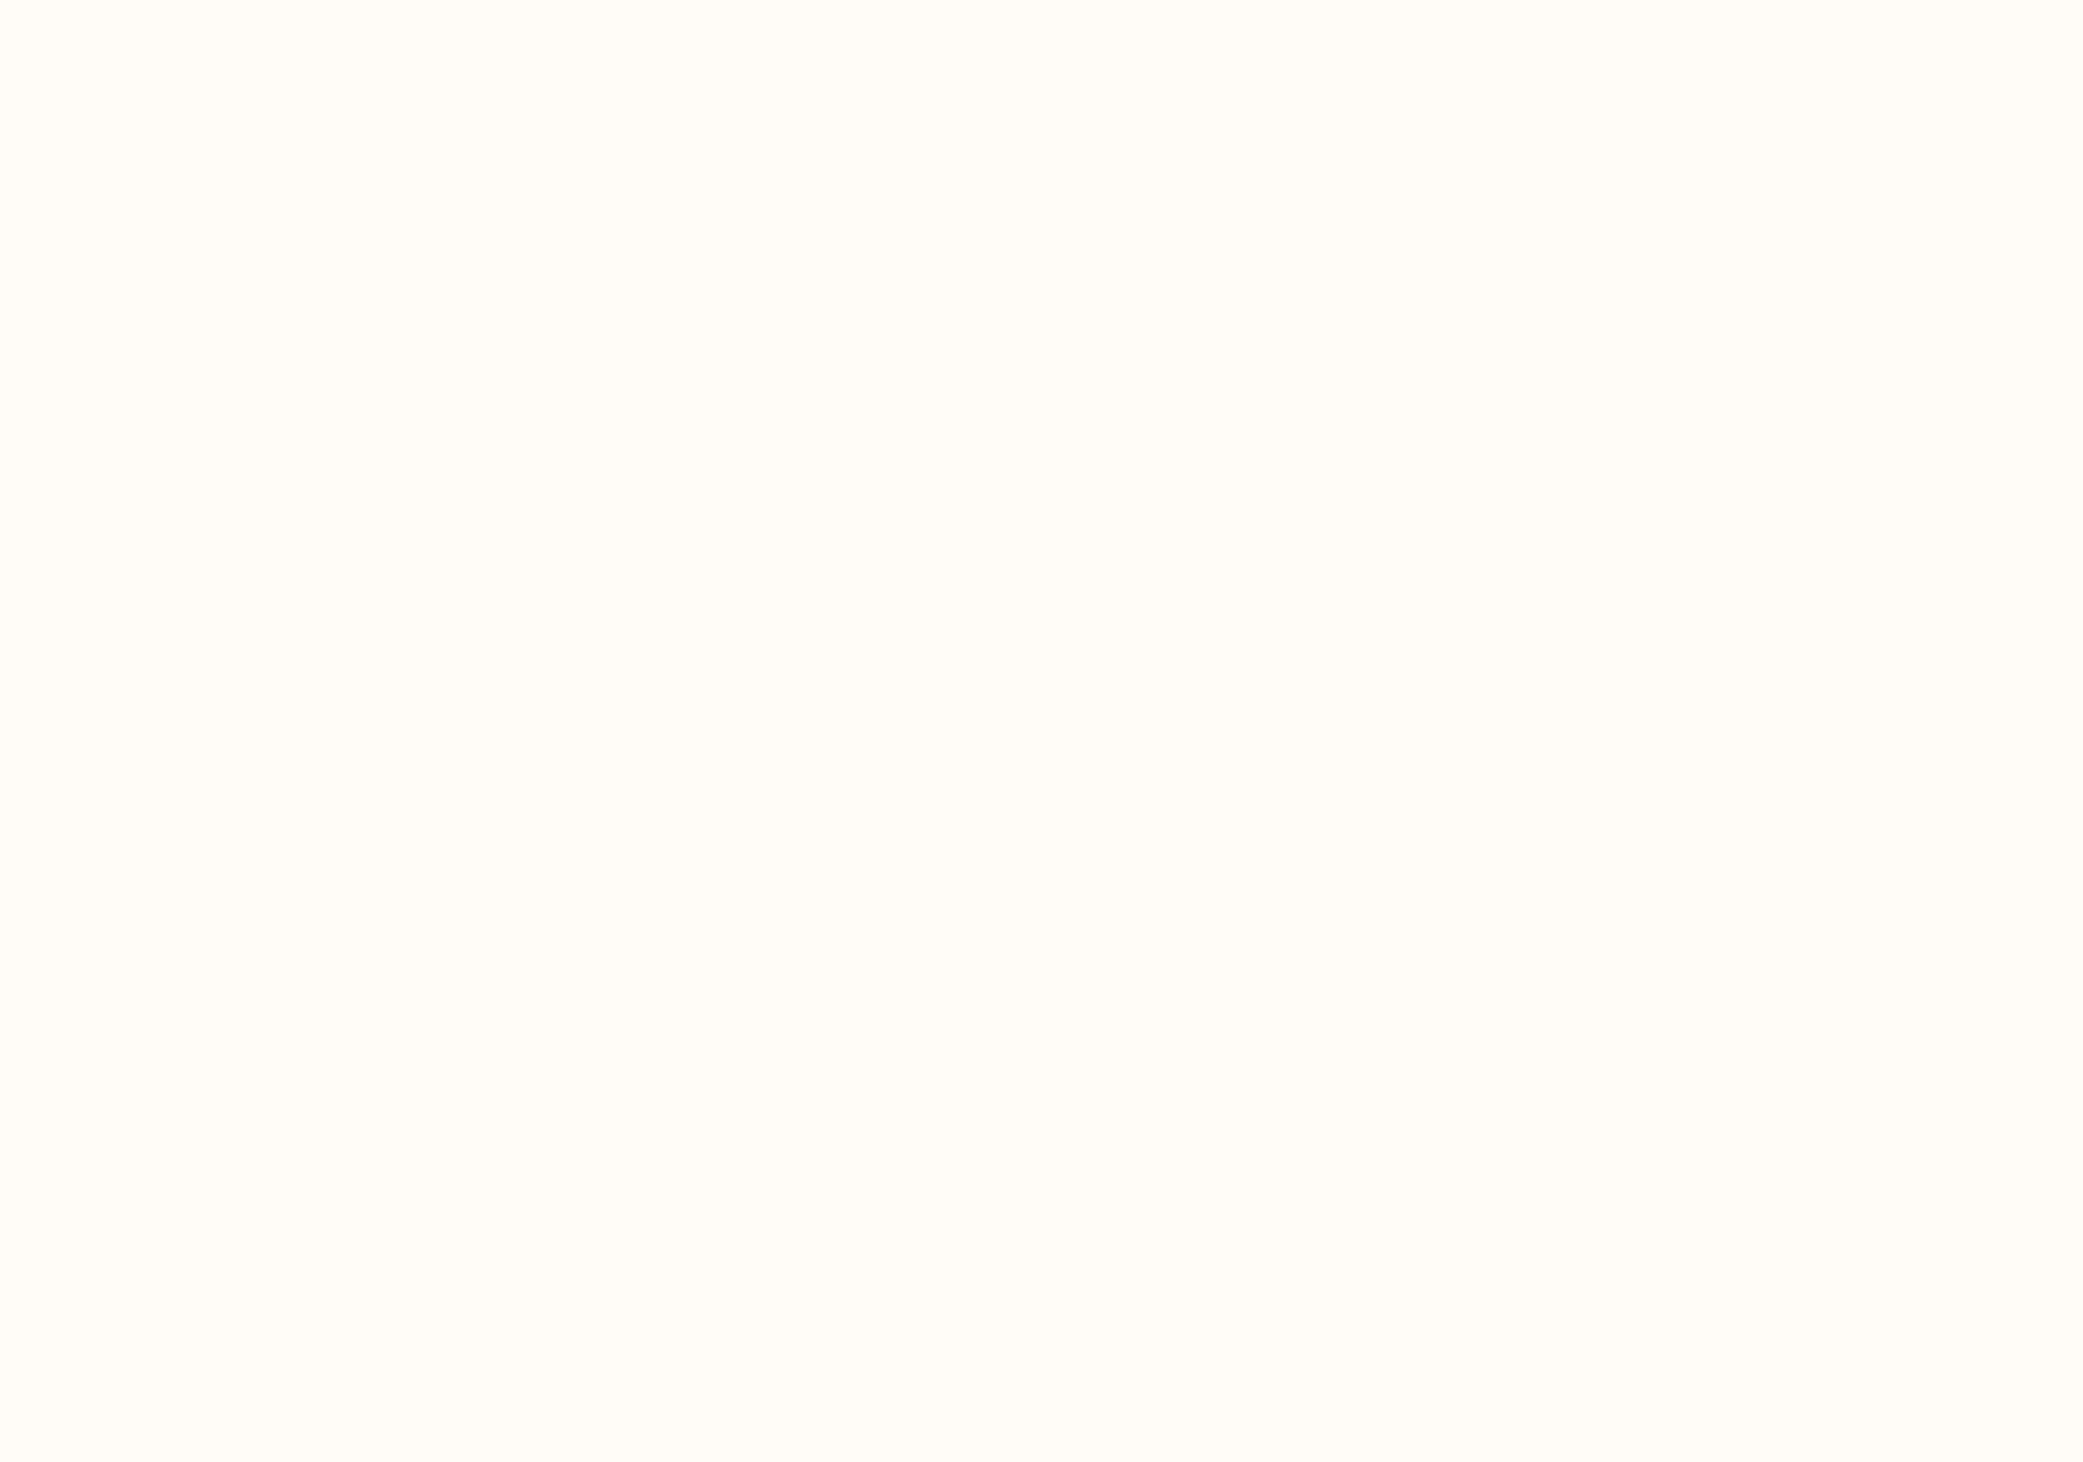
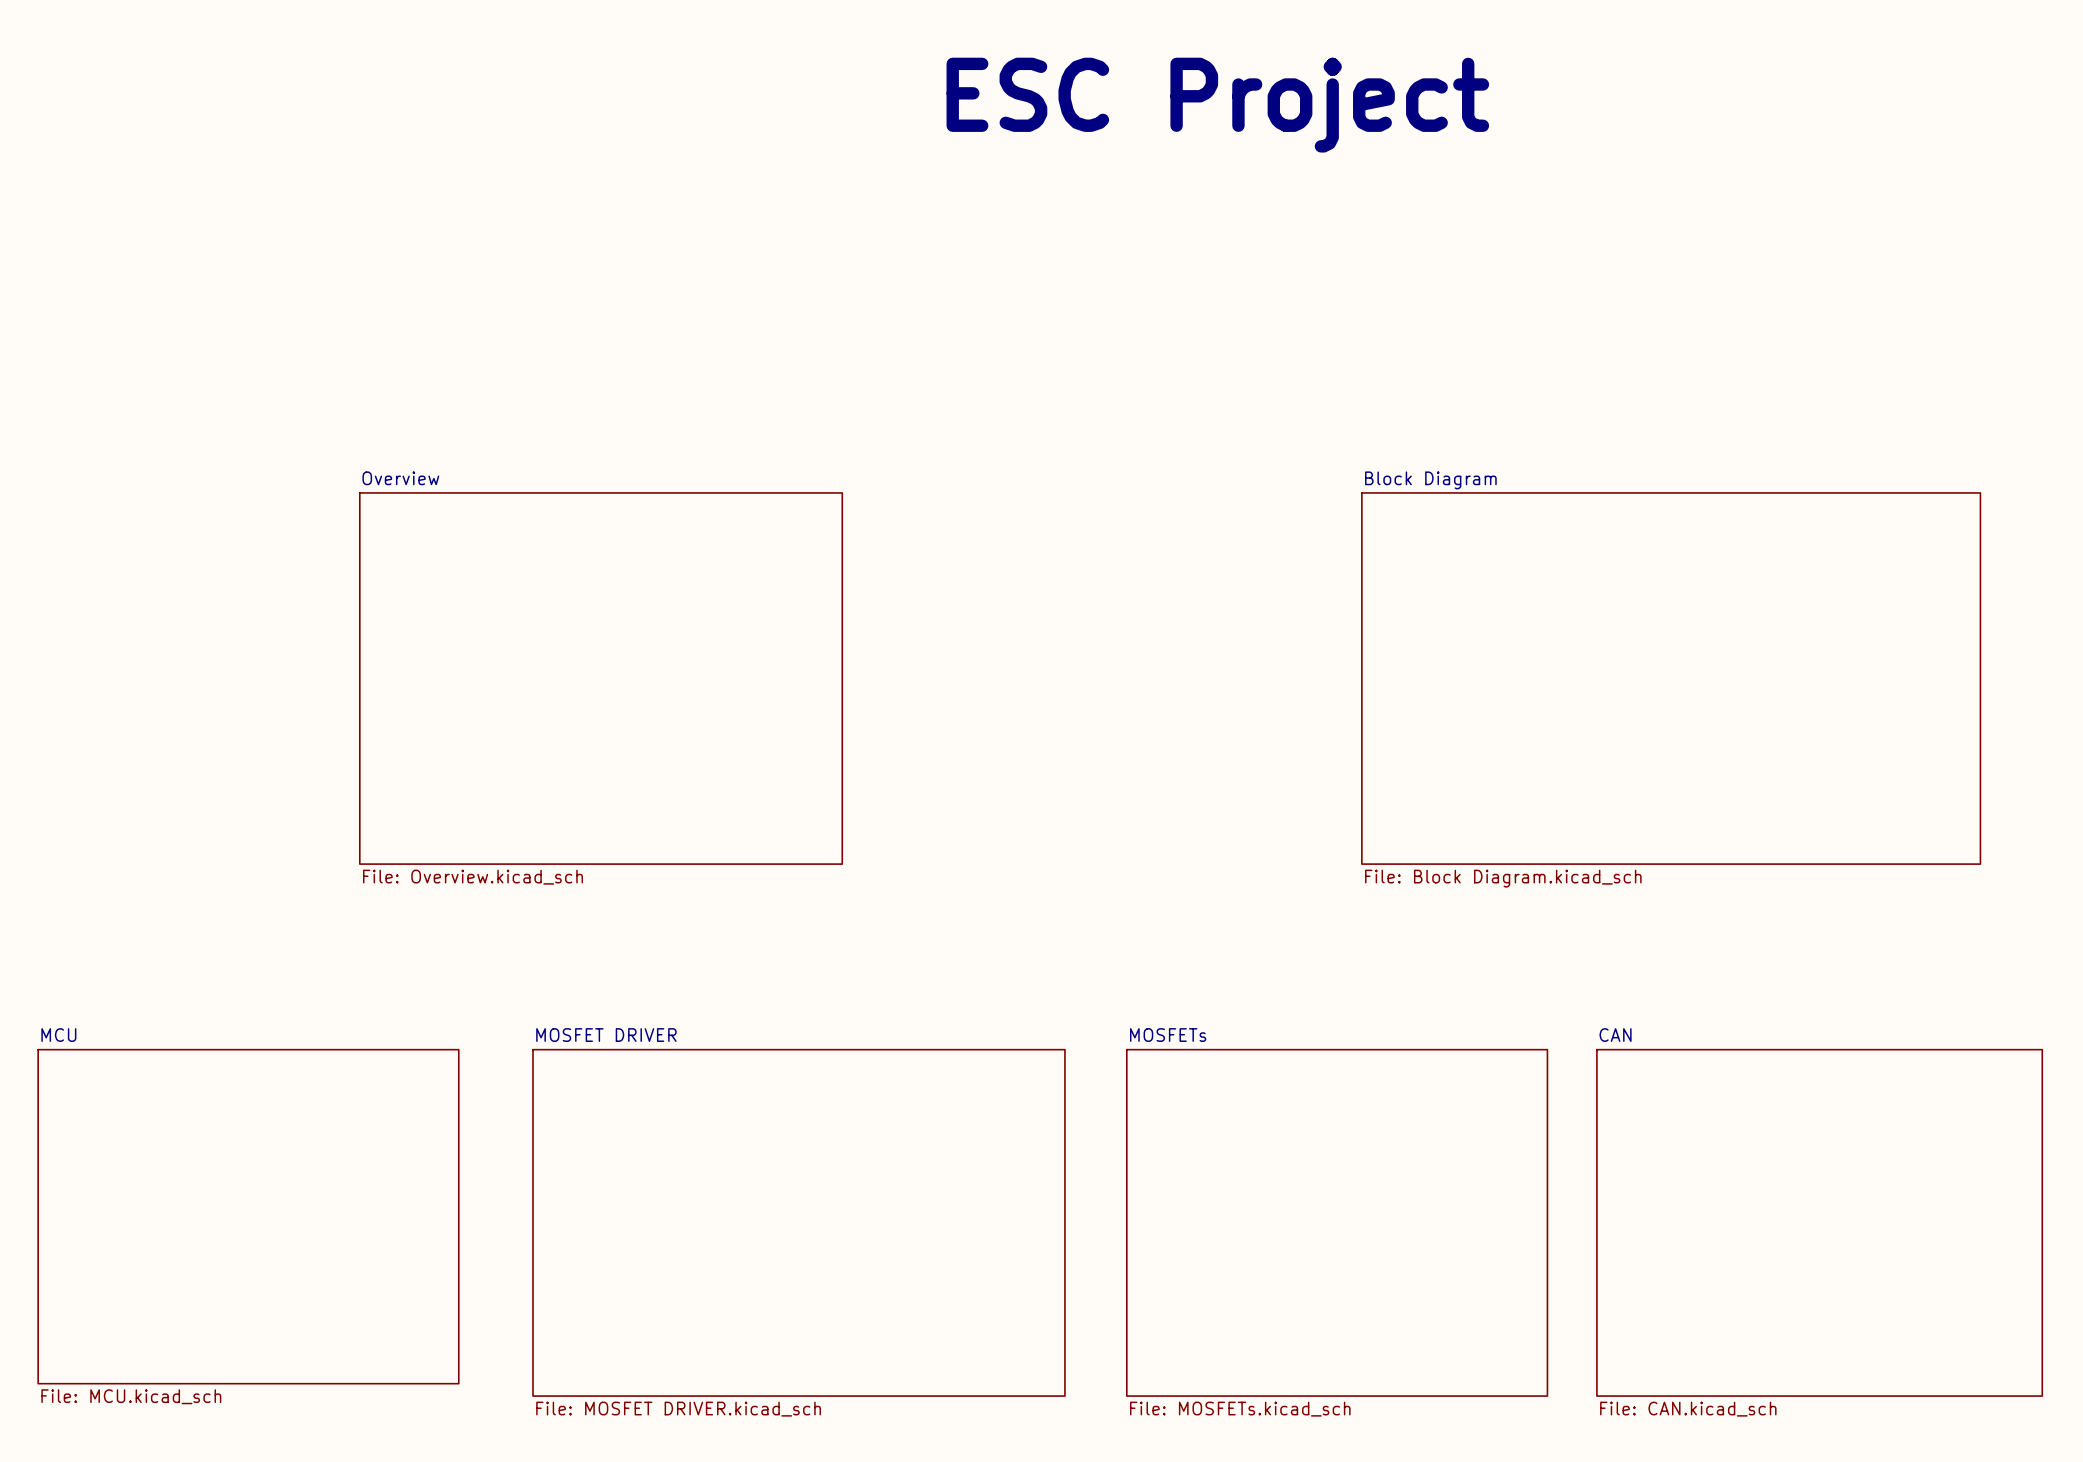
text: none -> ESC Project (1217, 105)
sheet Overview: none -> File: Overview.kicad_sch (601, 678)
sheet Block Diagram: none -> File: Block Diagram.kicad_sch (1671, 678)
sheet MCU: none -> File: MCU.kicad_sch (248, 1216)
sheet MOSFET DRIVER: none -> File: MOSFET DRIVER.kicad_sch (798, 1222)
sheet MOSFETs: none -> File: MOSFETs.kicad_sch (1337, 1222)
sheet CAN: none -> File: CAN.kicad_sch (1819, 1222)

